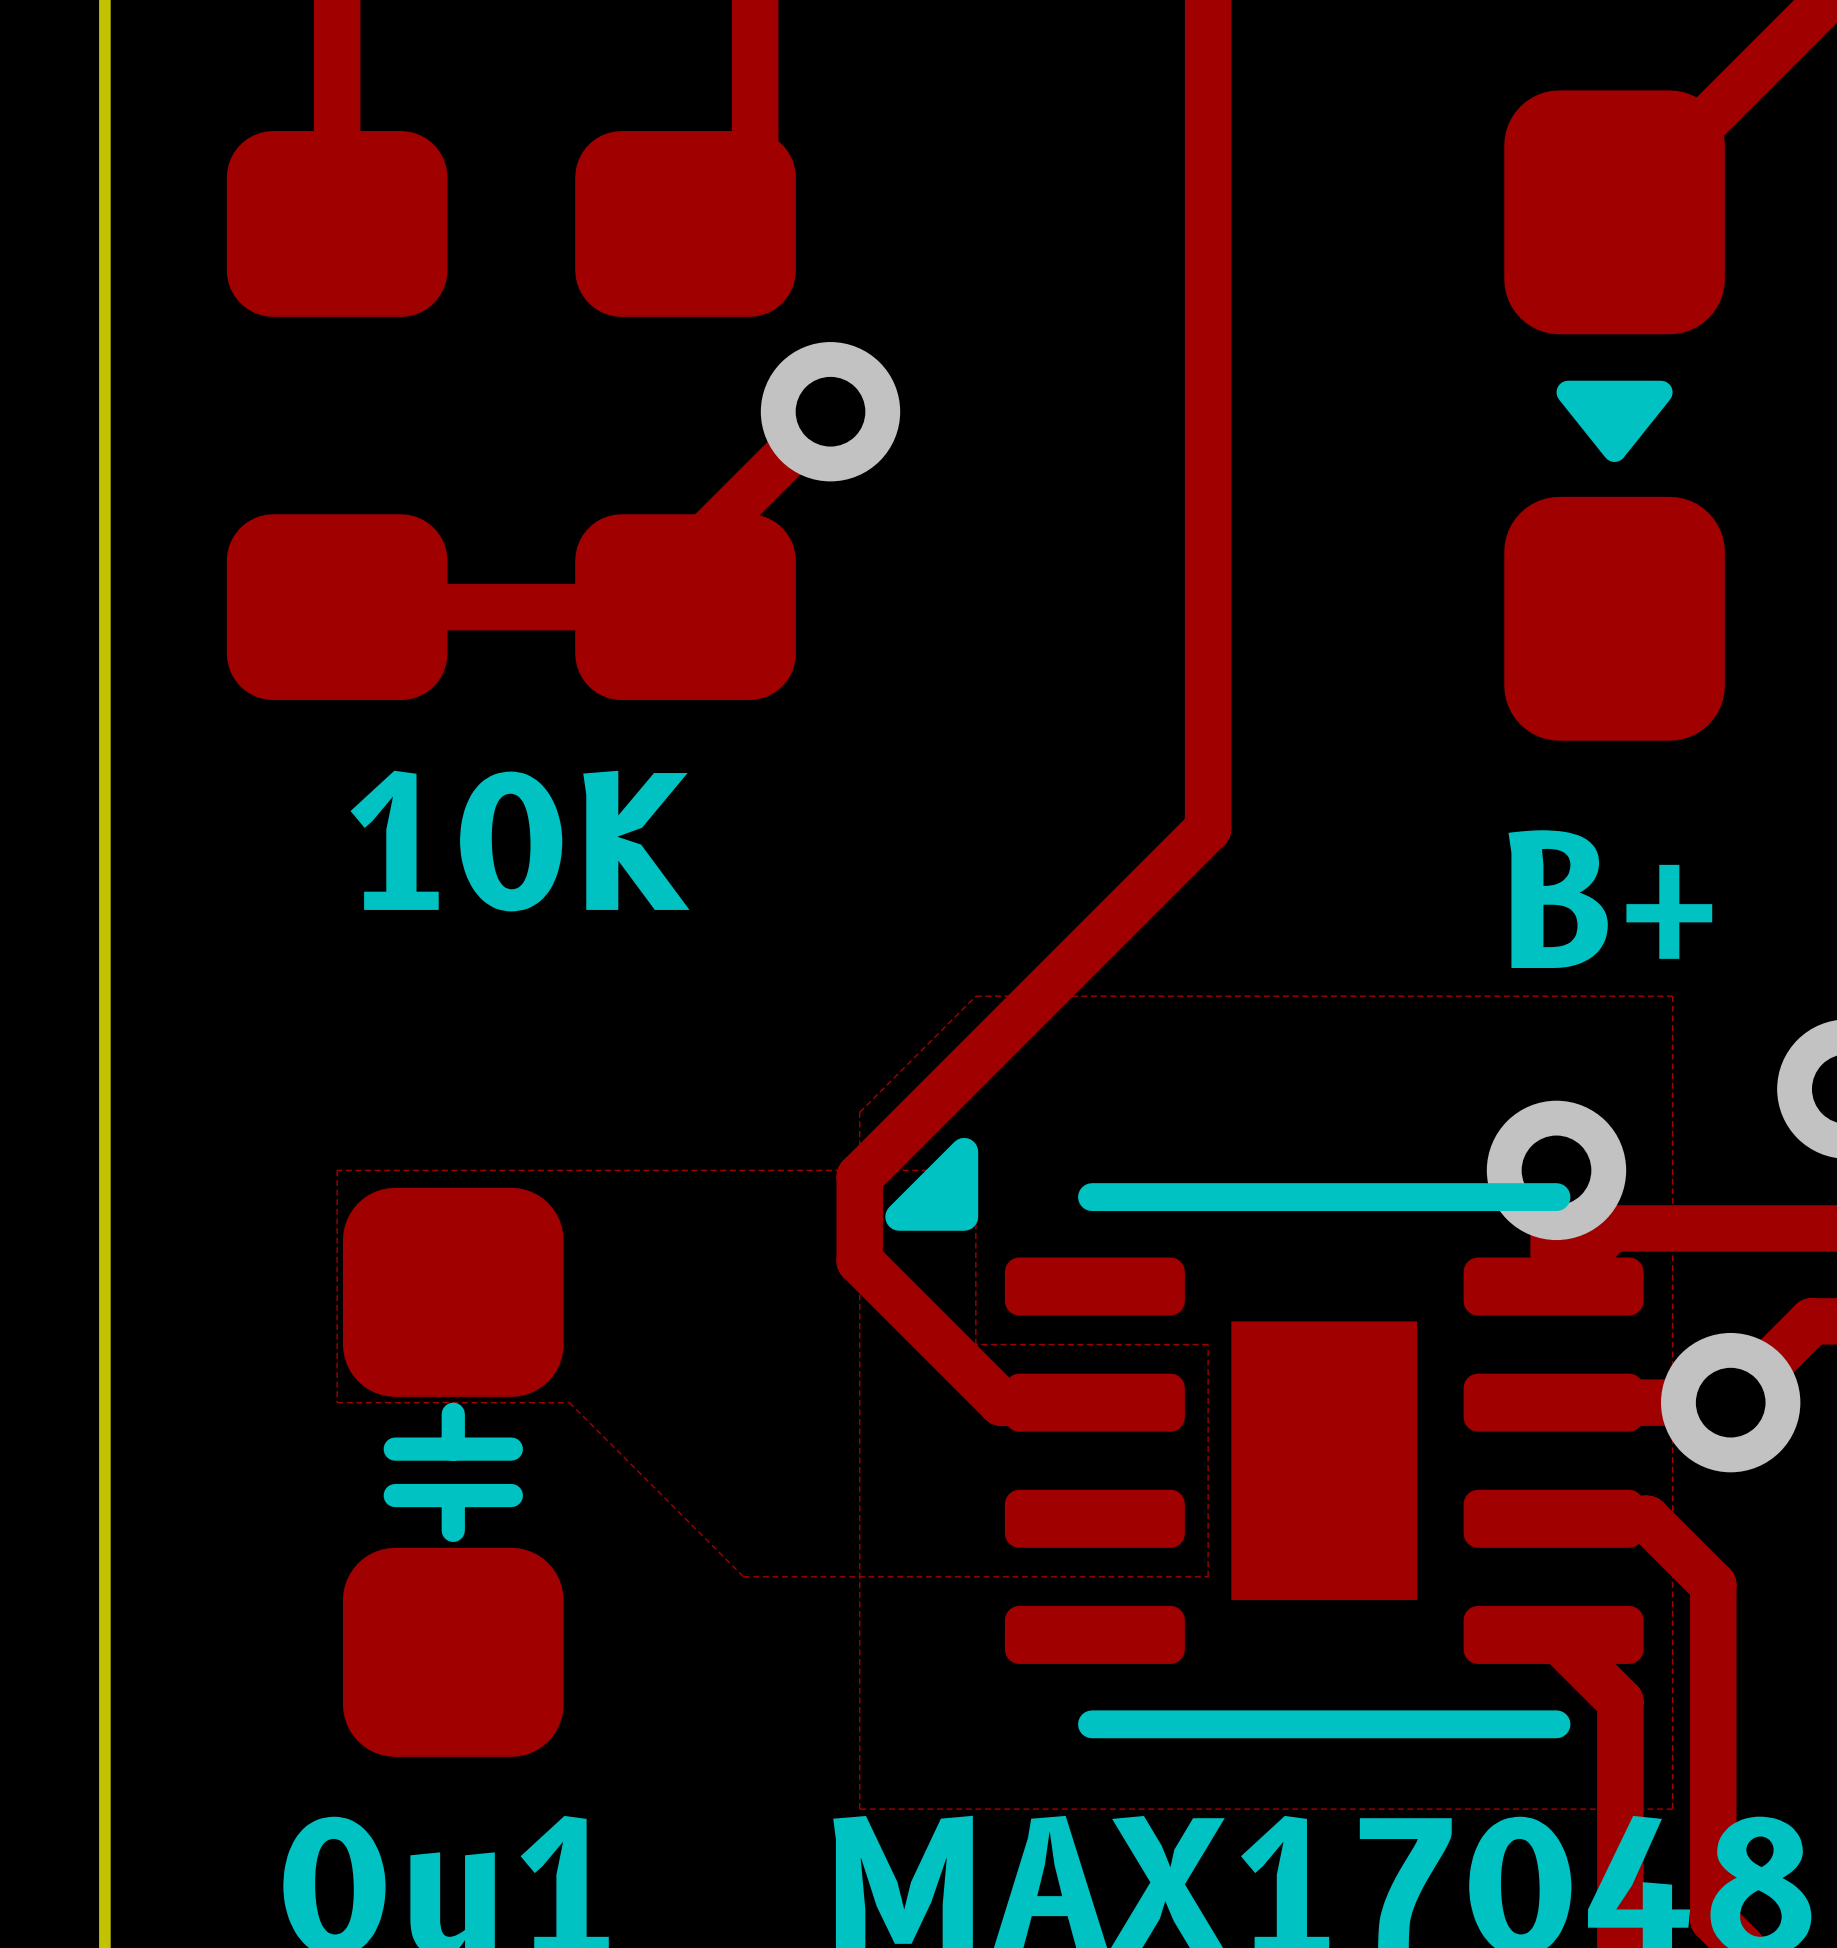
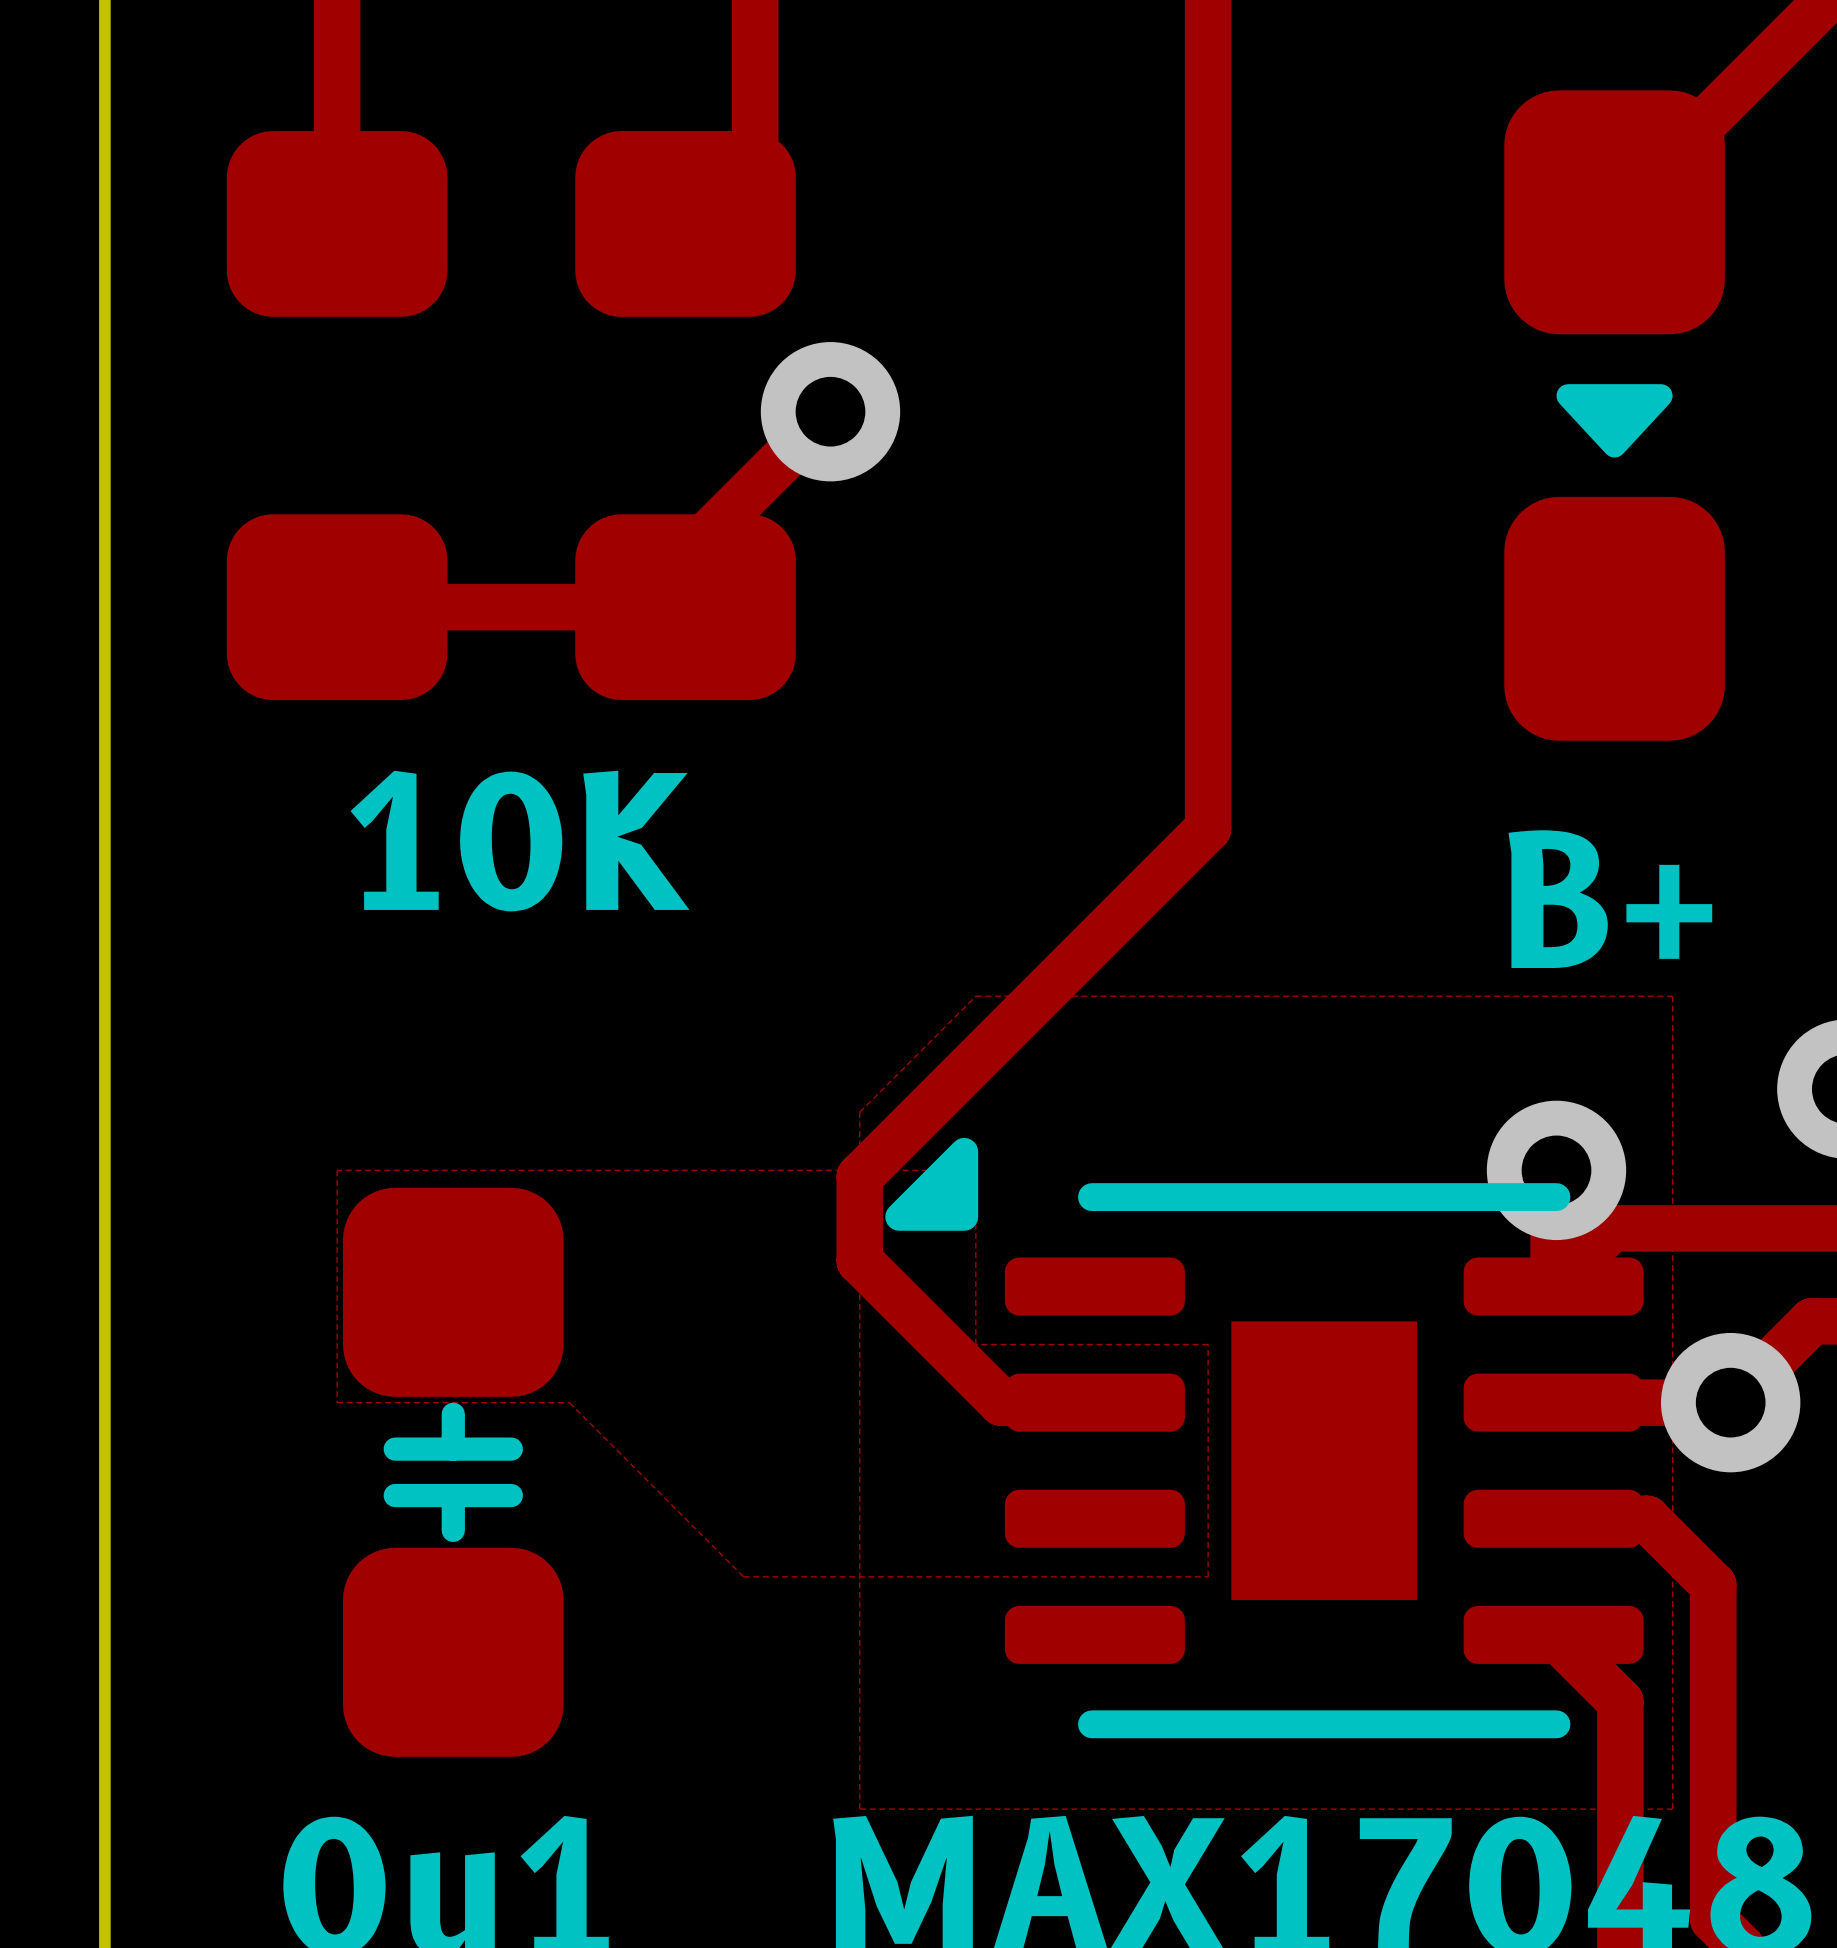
part footprint: [1504, 90, 1725, 741] -> [1504, 90, 1725, 741]

